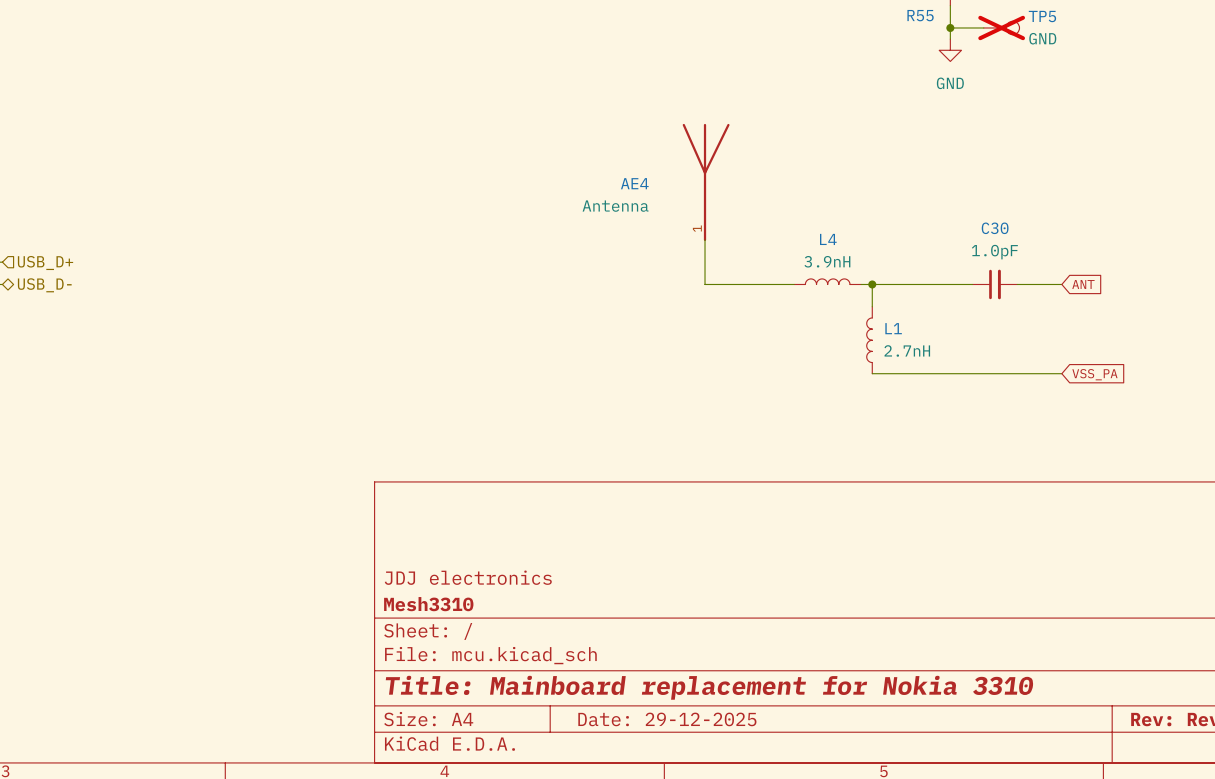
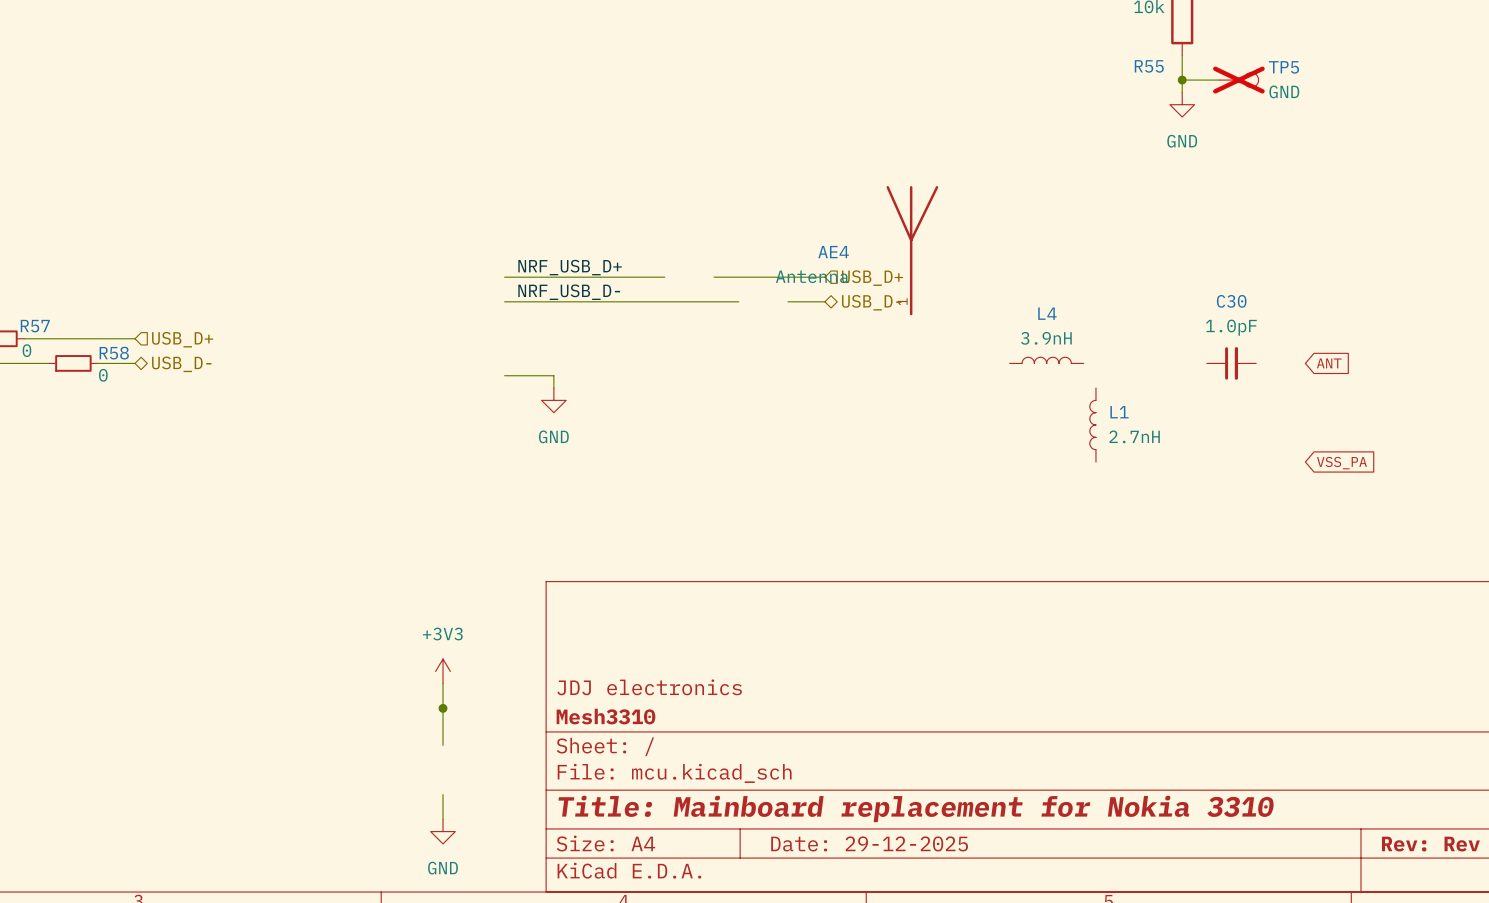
label: none -> NRF_USB_D+ (570, 267)
wire: none -> (504, 277) (664, 277)
wire: none -> (714, 277) (824, 277)
hierarchical label: none -> USB_D+ (872, 278)
label: none -> NRF_USB_D- (569, 292)
wire: none -> (504, 301) (738, 301)
wire: none -> (787, 301) (824, 301)
hierarchical label: none -> USB_D- (871, 302)
wire: (705, 239) (705, 284) (794, 284) -> none
wire: (861, 284) (972, 284) -> none
wire: (872, 284) (872, 306) -> none
junction: (872, 284) -> none
wire: (1017, 284) (1061, 284) -> none
wire: none -> (504, 375) (553, 375) (553, 388)
power symbol: none -> GND (553, 400)
wire: (872, 373) (1061, 373) -> none
power symbol: none -> +3V3 (443, 671)
wire: none -> (443, 683) (443, 745)
junction: none -> (443, 708)
wire: none -> (443, 794) (443, 819)
power symbol: none -> GND (443, 831)

